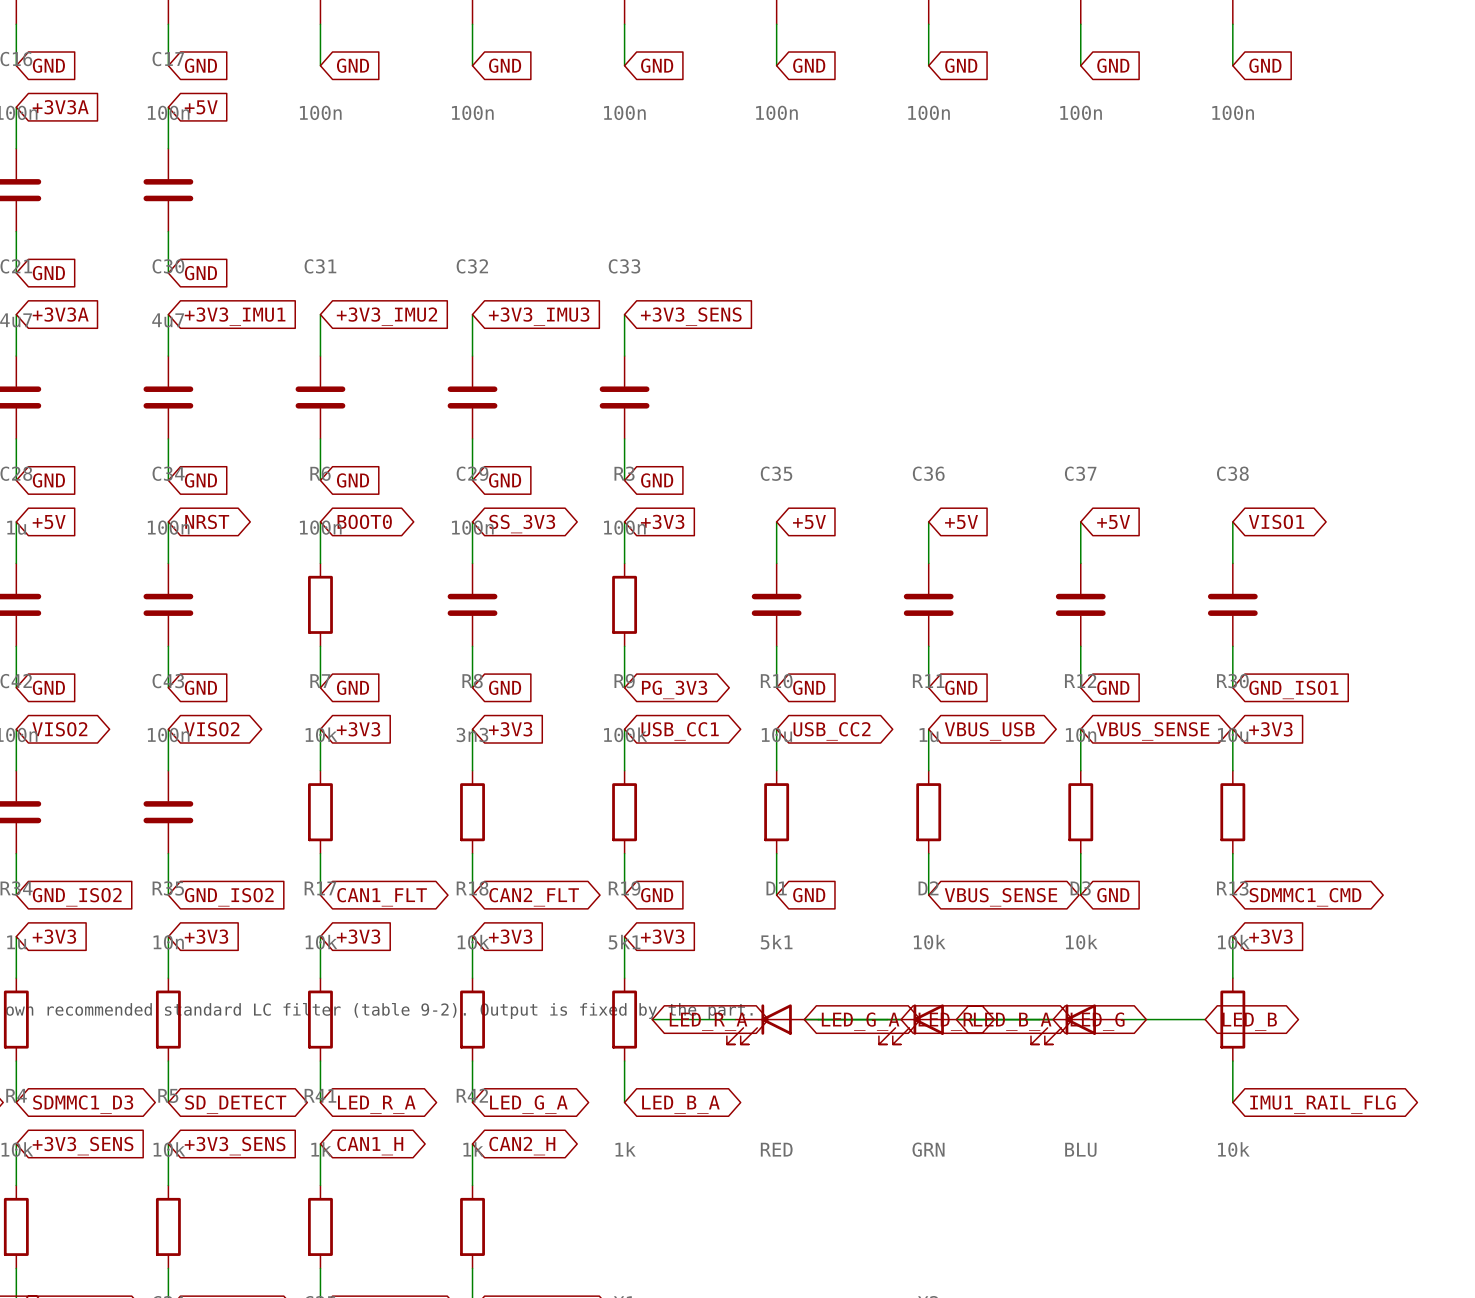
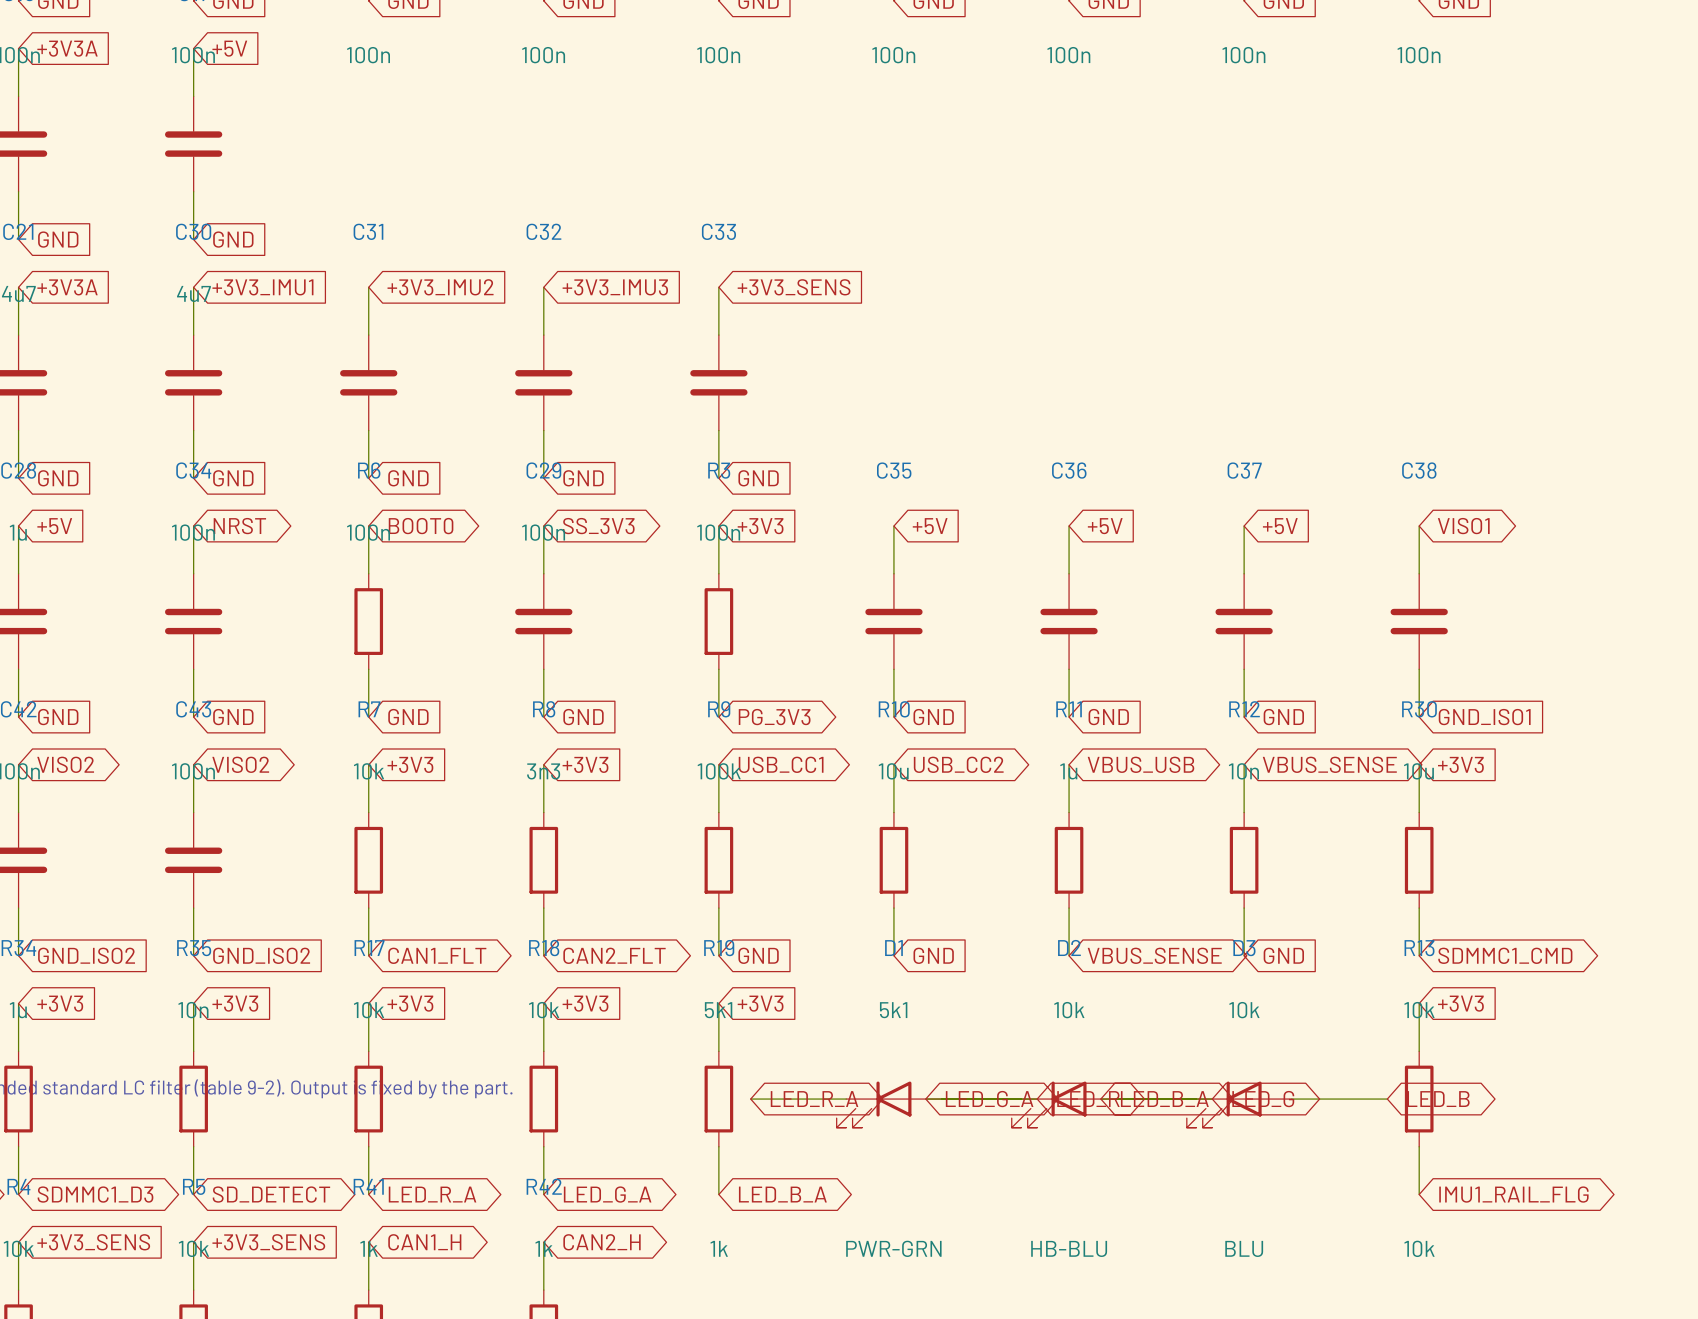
D1 value: RED (776, 1149) -> PWR-GRN (893, 1248)
D2 value: GRN (928, 1149) -> HB-BLU (1069, 1248)

